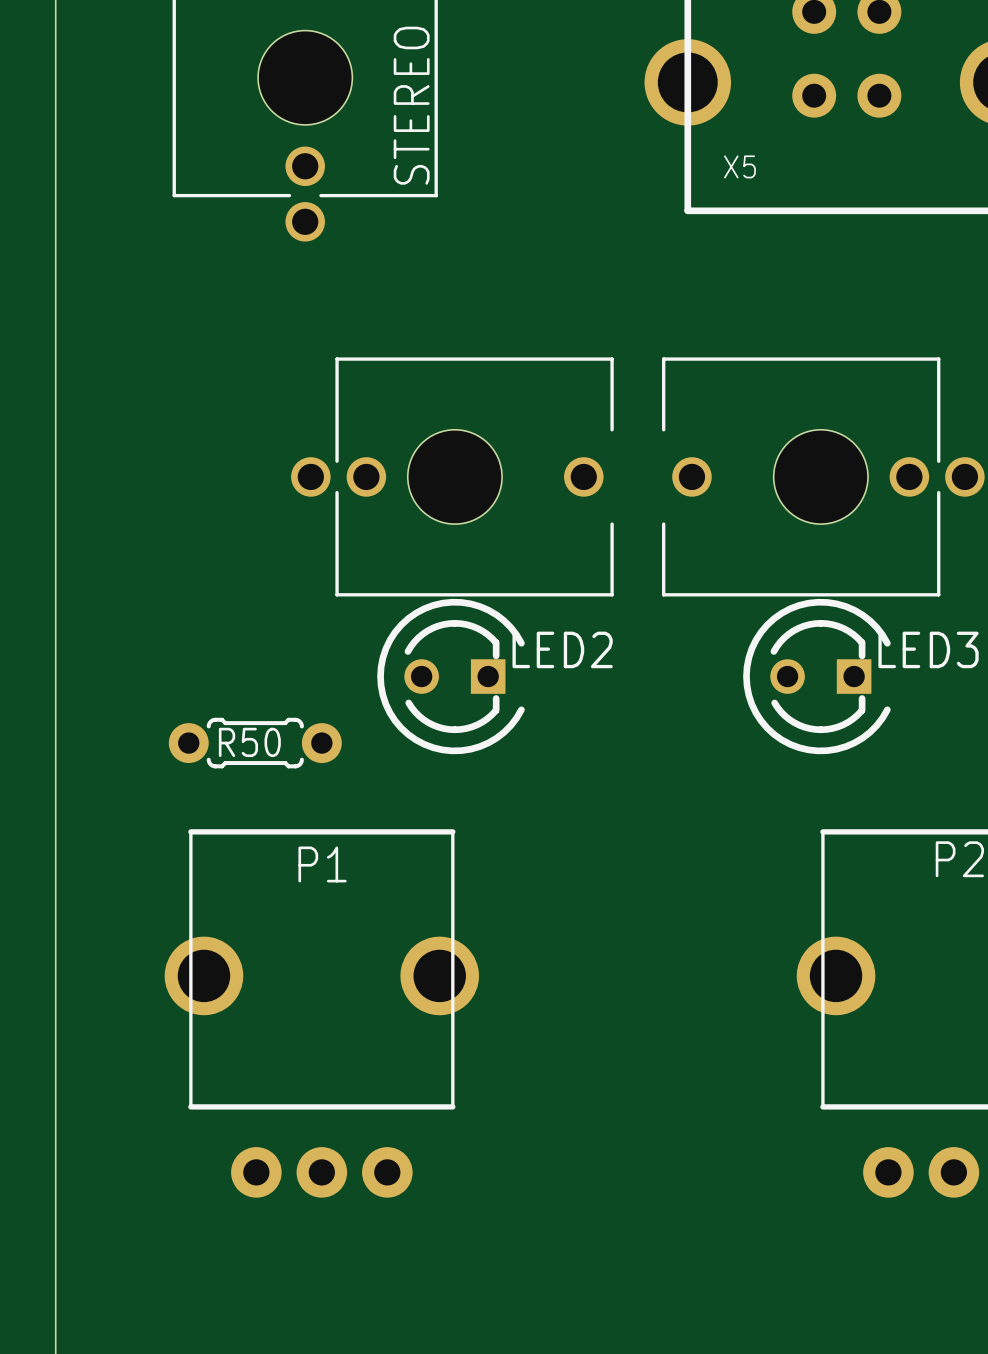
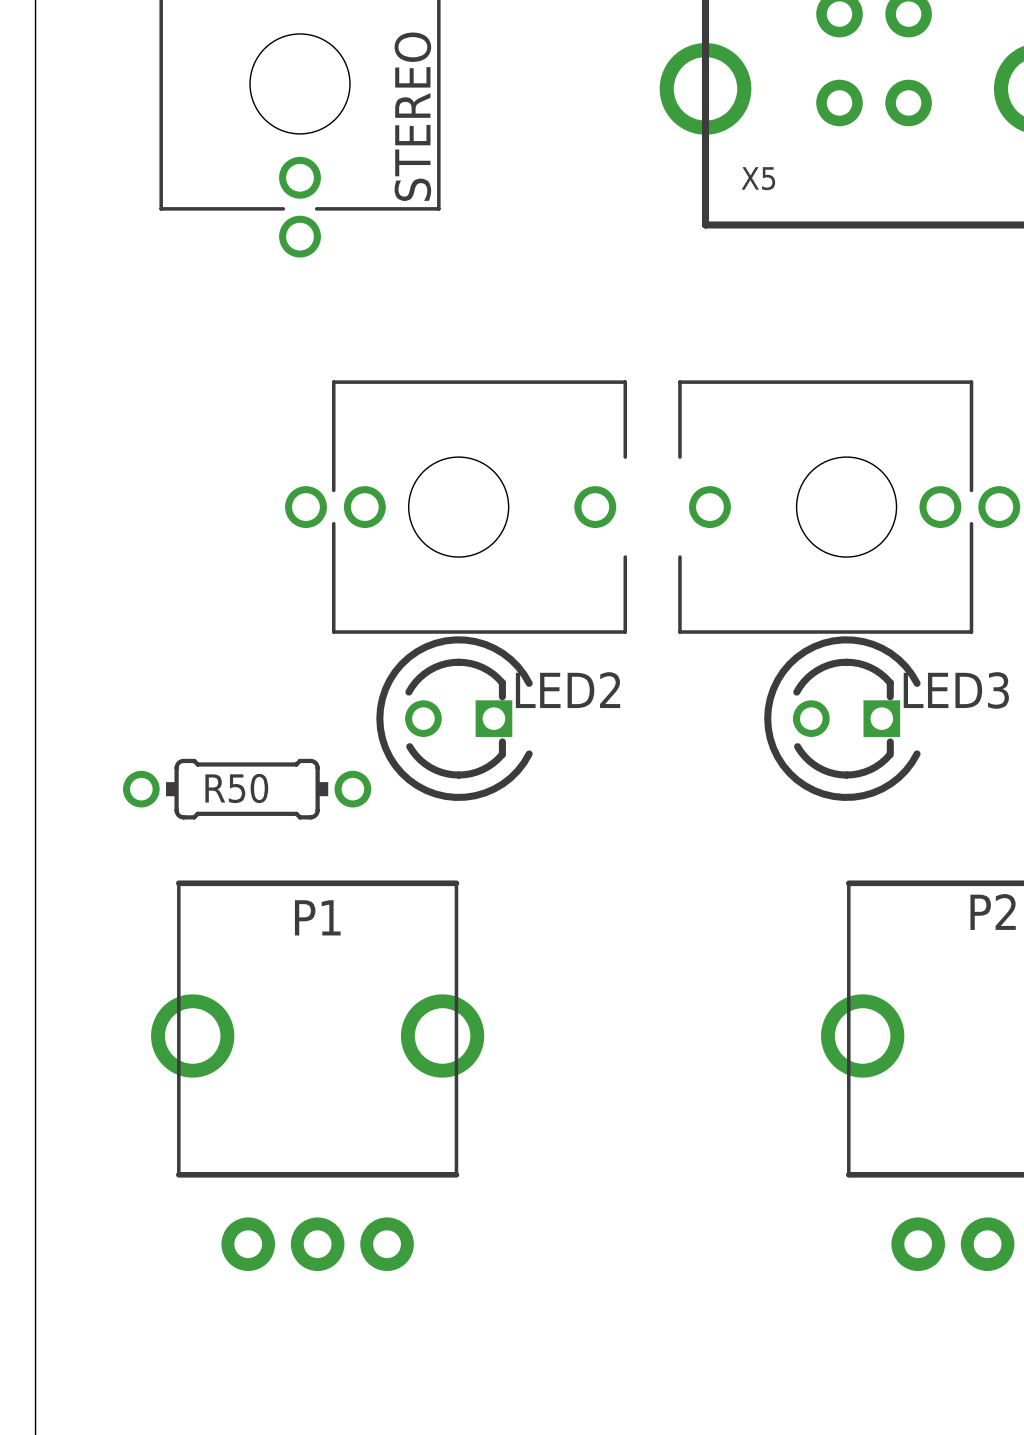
R50 footprint: [168, 717, 342, 769] -> [122, 758, 372, 820]

